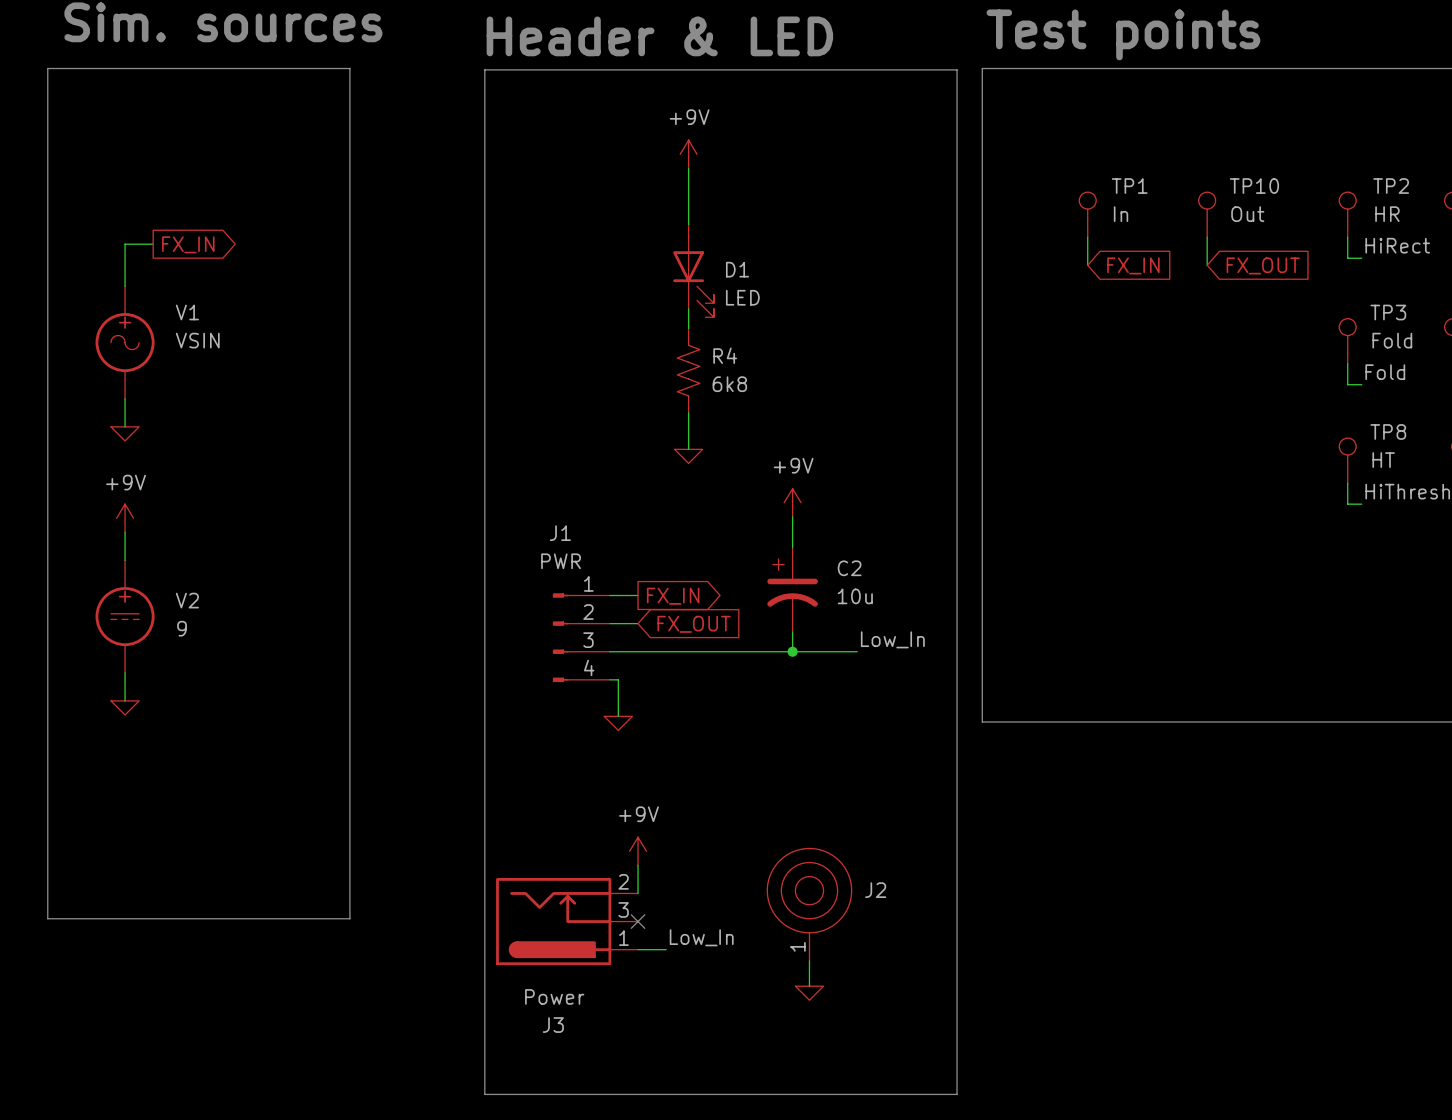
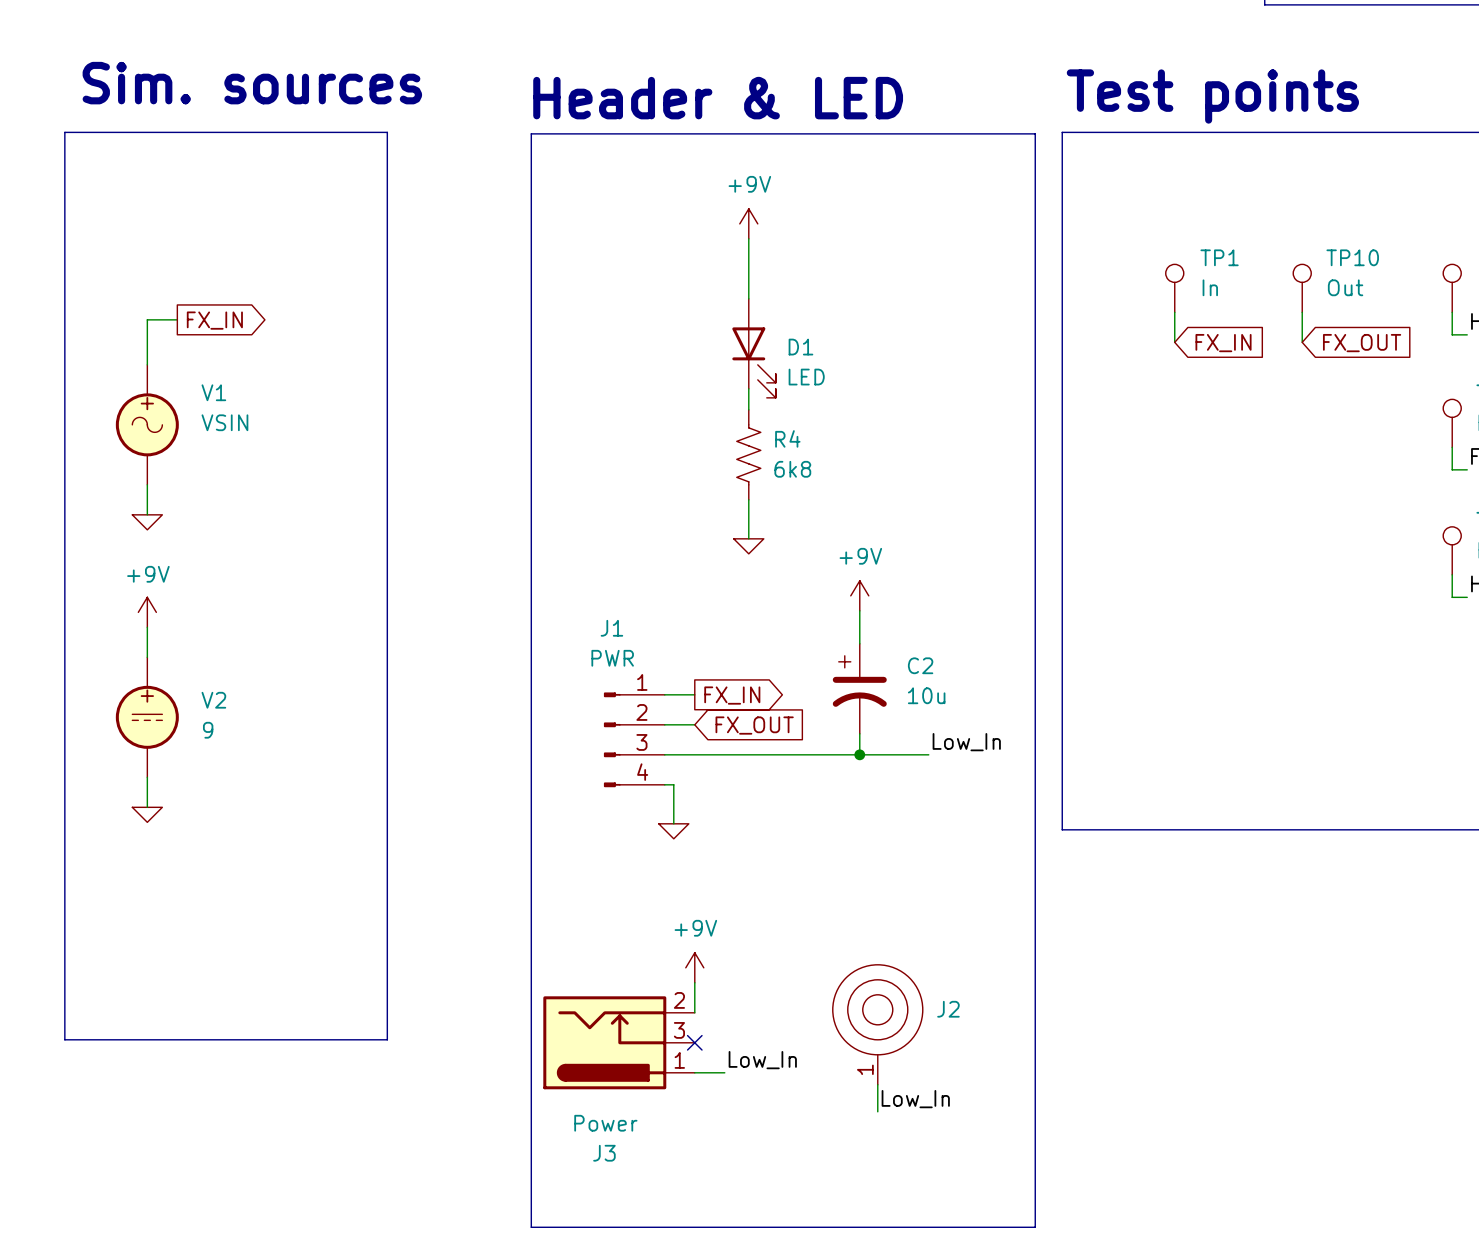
label: none -> Low_In (915, 1099)
power symbol: (809, 993) -> none

